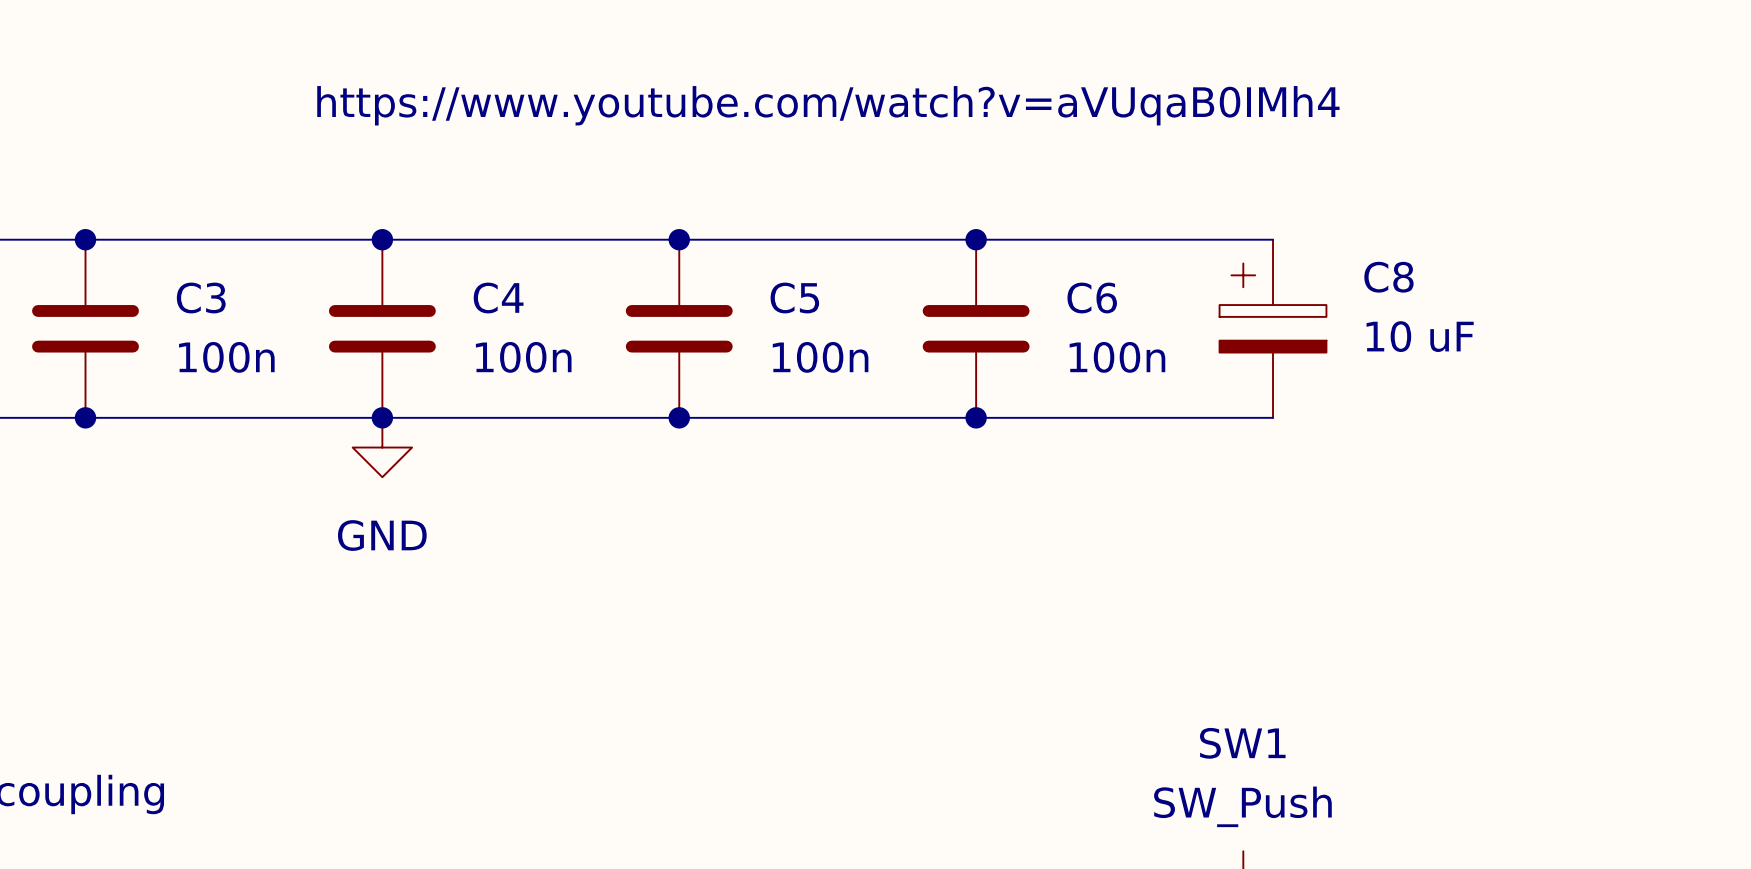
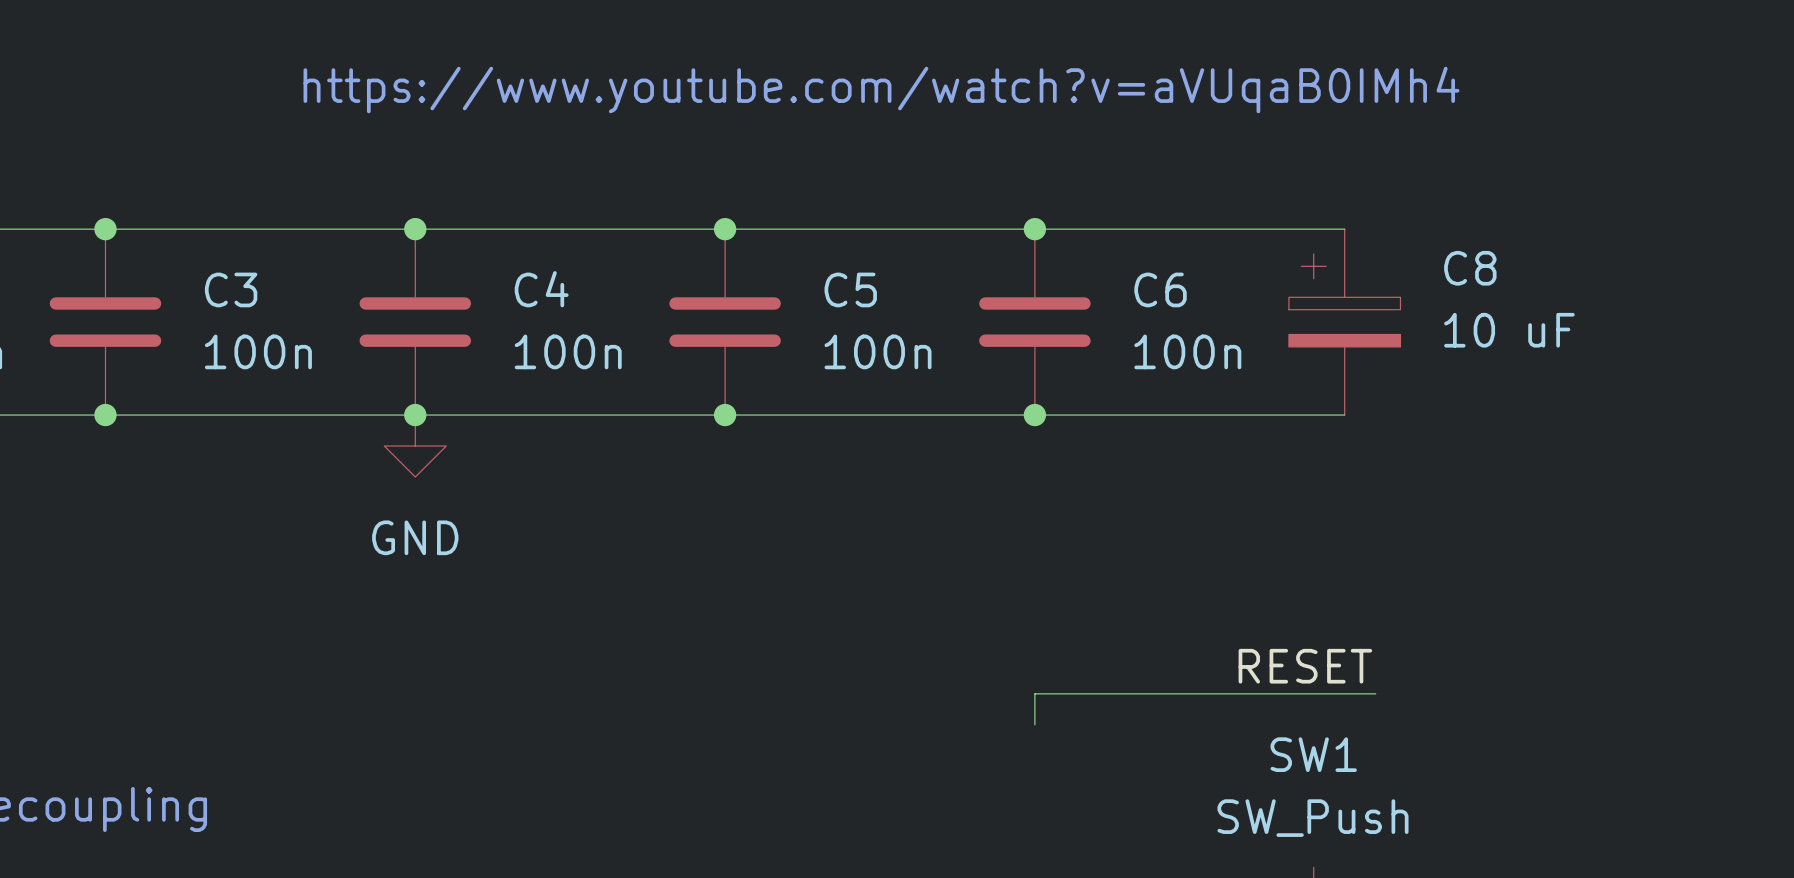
label: none -> RESET (1305, 666)
wire: none -> (1375, 693) (1034, 693) (1034, 724)

